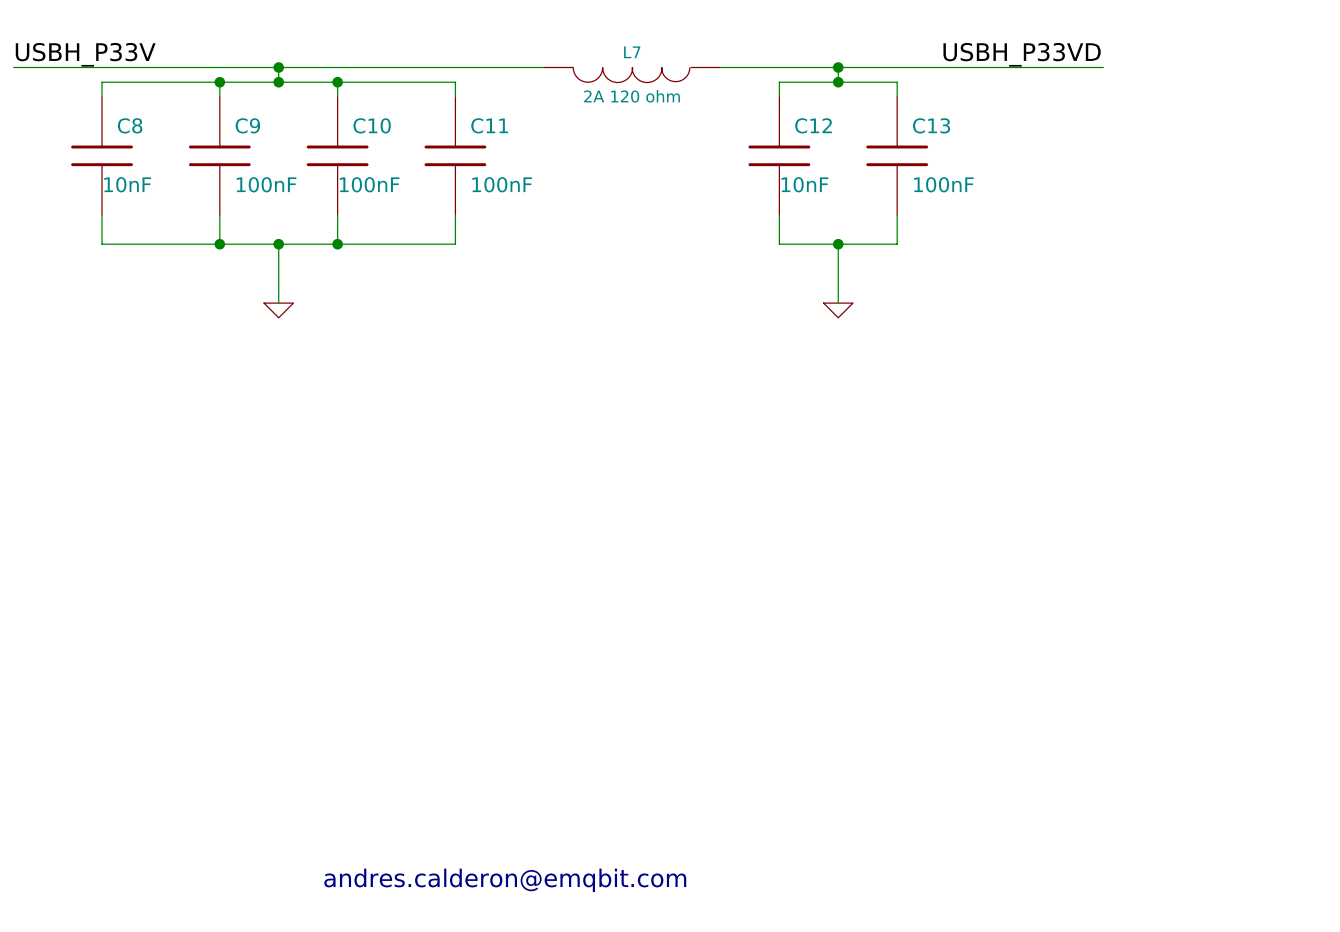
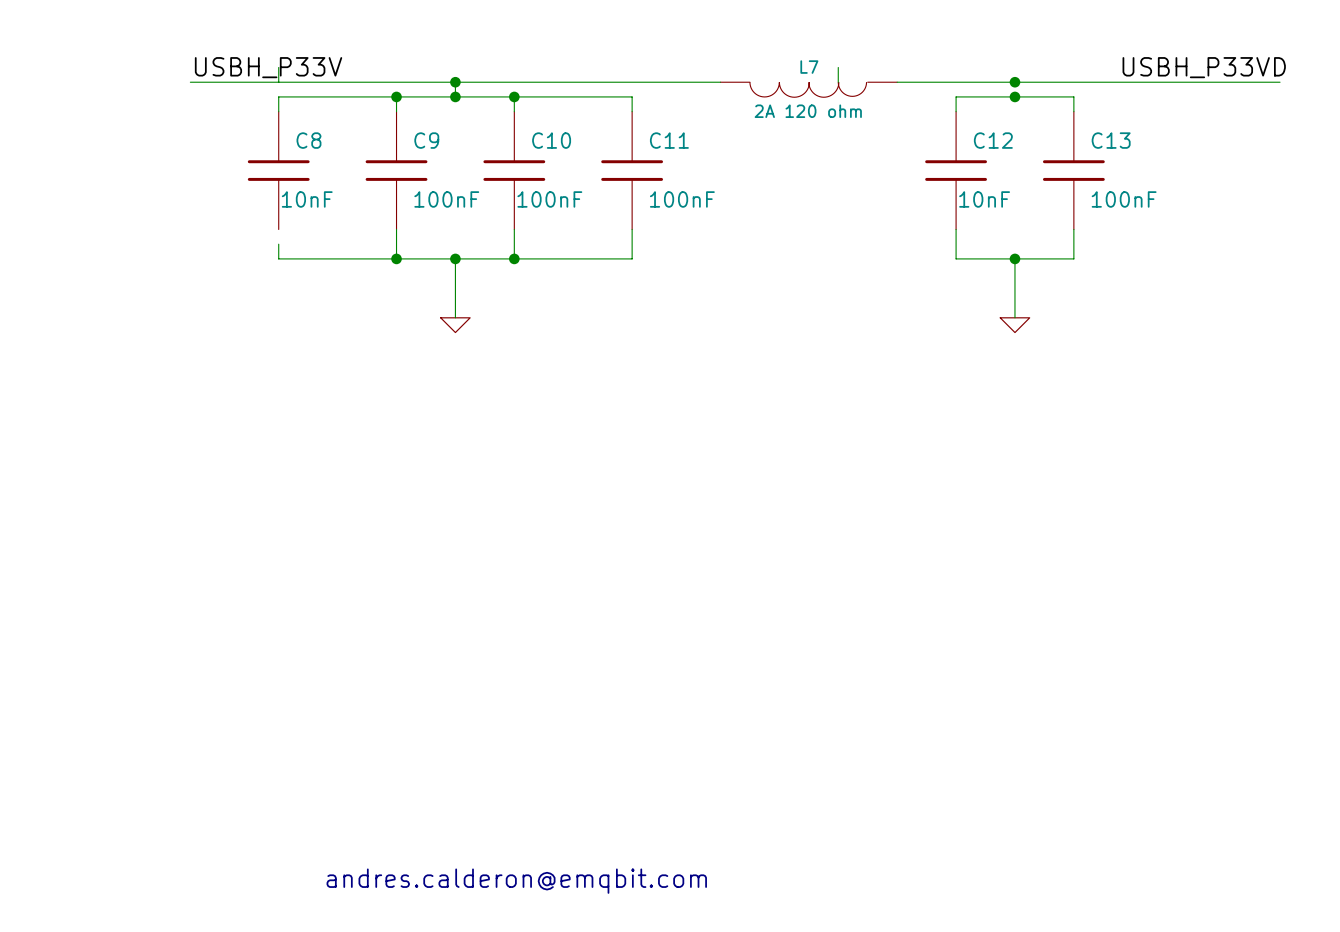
label position: USBH_P33V (85, 54) -> USBH_P33V (268, 67)
label position: USBH_P33VD (1022, 54) -> USBH_P33VD (1204, 67)
wire: (13, 67) (543, 67) -> none
junction: (278, 67) -> none
wire: (720, 67) (1103, 67) -> (897, 82) (1280, 82)
junction: (838, 67) -> none
L7 position: (632, 75) -> (808, 89)
wire: (190, 82) (102, 82) (102, 96) -> none
wire: (219, 82) (219, 96) -> (396, 96) (396, 111)
junction: (219, 82) -> none
junction: (278, 82) -> none
wire: (337, 82) (337, 96) -> (514, 96) (514, 111)
junction: (337, 82) -> none
wire: none -> (455, 82) (720, 82)
junction: none -> (455, 82)
junction: (838, 82) -> none
junction: none -> (1014, 82)
junction: none -> (396, 96)
junction: none -> (455, 96)
junction: none -> (514, 96)
wire: (779, 96) (779, 82) (897, 82) (897, 96) -> (956, 111) (956, 96) (1073, 96) (1073, 111)
junction: none -> (1014, 96)
wire: none -> (278, 111) (278, 96) (632, 96) (632, 111)
C8 position: (102, 155) -> (278, 170)
C9 position: (219, 155) -> (396, 170)
C10 position: (337, 155) -> (514, 170)
C11 position: (455, 155) -> (632, 170)
C12 position: (779, 155) -> (956, 170)
C13 position: (897, 155) -> (1073, 170)
wire: (102, 214) (102, 244) (455, 244) (455, 214) -> none
wire: (219, 214) (219, 244) -> (396, 229) (396, 258)
wire: (337, 214) (337, 244) -> (514, 229) (514, 258)
wire: (779, 214) (779, 244) (897, 244) (897, 214) -> (956, 229) (956, 258) (1073, 258) (1073, 229)
junction: (219, 244) -> none
junction: (278, 244) -> none
junction: (337, 244) -> none
wire: (838, 244) (838, 303) -> (1014, 258) (1014, 317)
junction: (838, 244) -> none
wire: (278, 258) (278, 303) -> (278, 258) (632, 258) (632, 229)
junction: none -> (396, 258)
wire: none -> (455, 258) (455, 317)
junction: none -> (455, 258)
junction: none -> (514, 258)
junction: none -> (1014, 258)
power symbol position: (278, 310) -> (455, 325)
power symbol position: (838, 310) -> (1014, 325)

